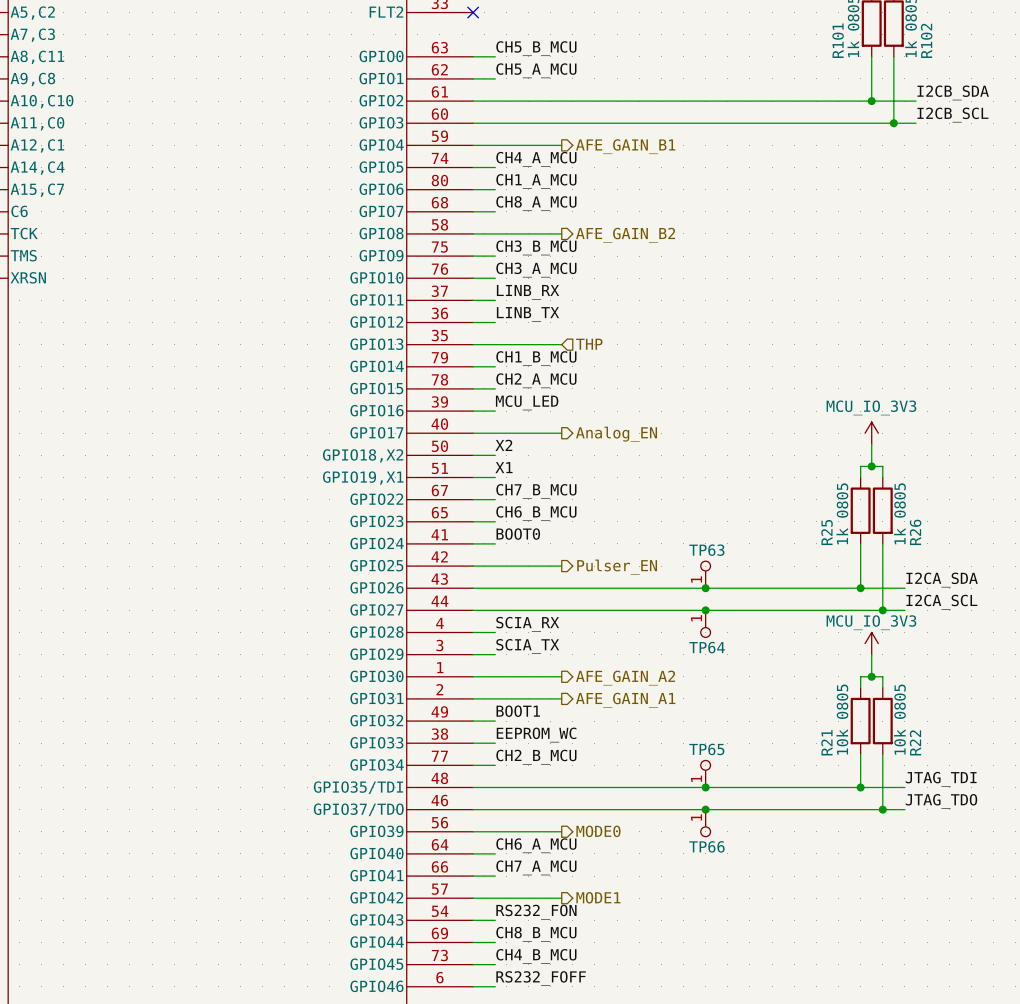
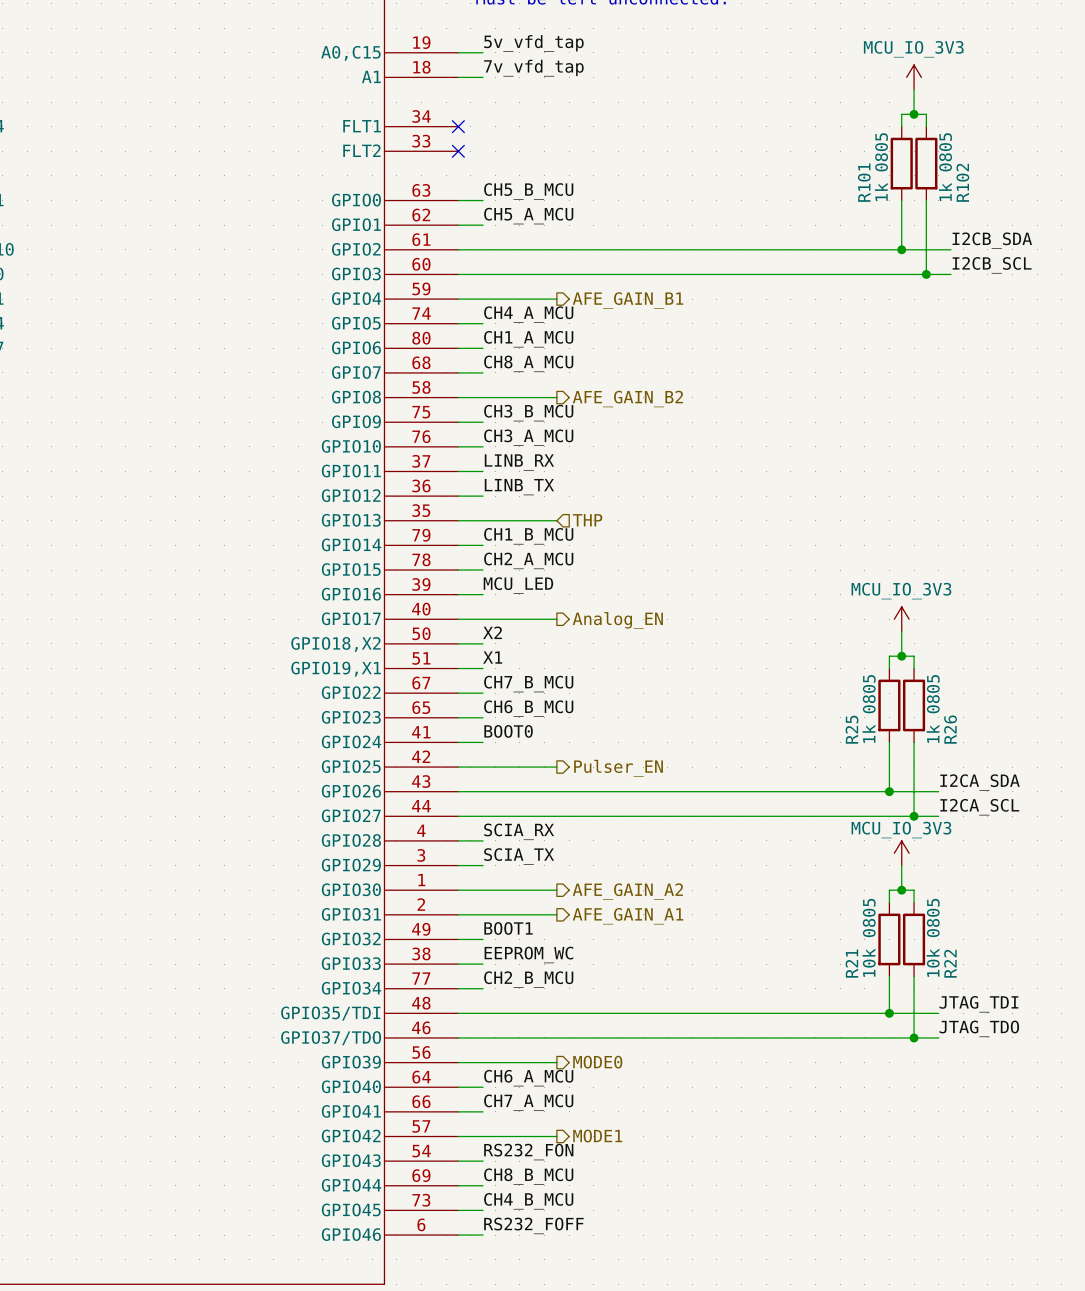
TP63: (705, 574) -> none
junction: (705, 588) -> none
junction: (705, 610) -> none
TP64: (705, 623) -> none
TP65: (705, 773) -> none
junction: (705, 787) -> none
junction: (705, 809) -> none
TP66: (705, 823) -> none

